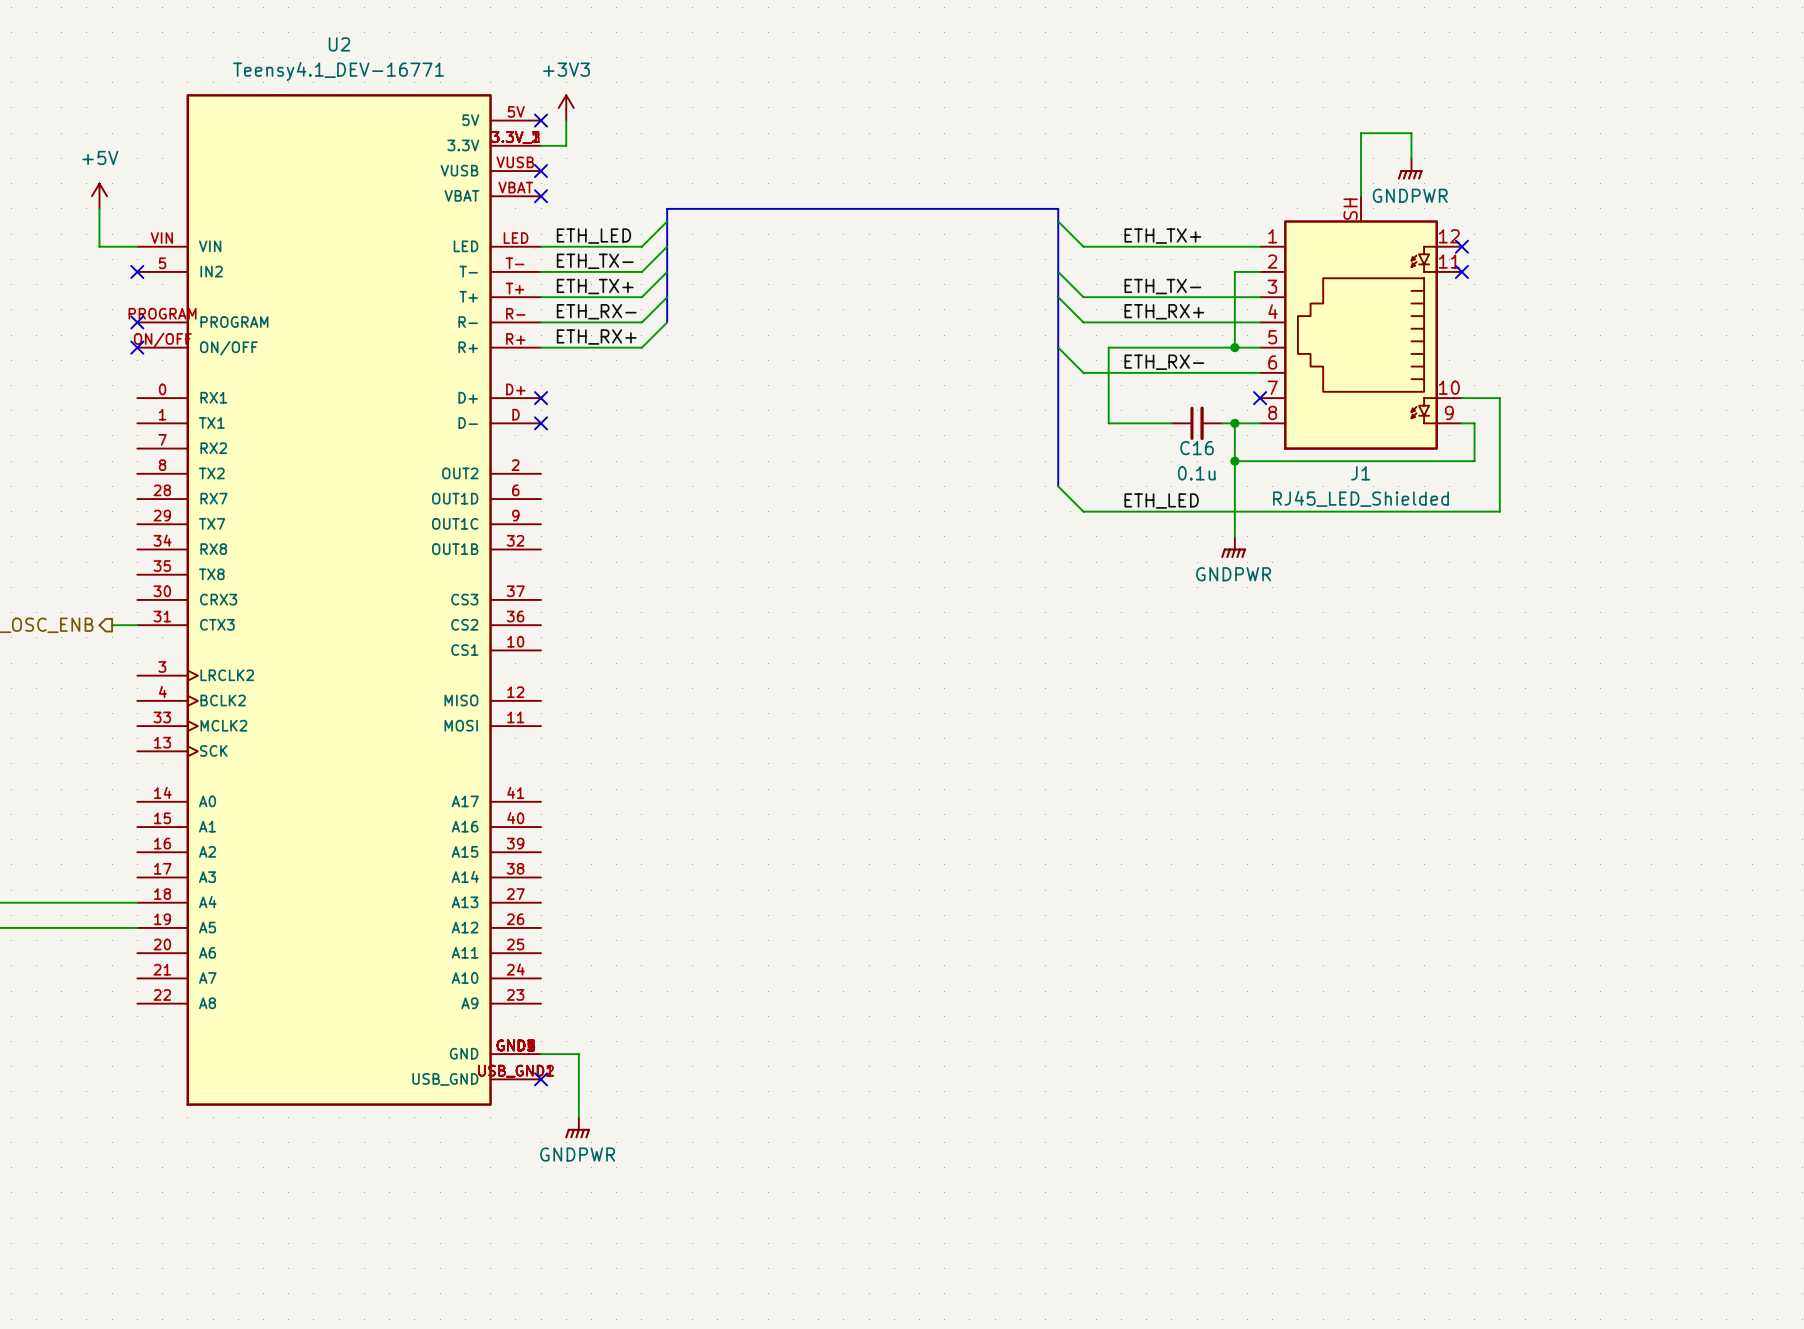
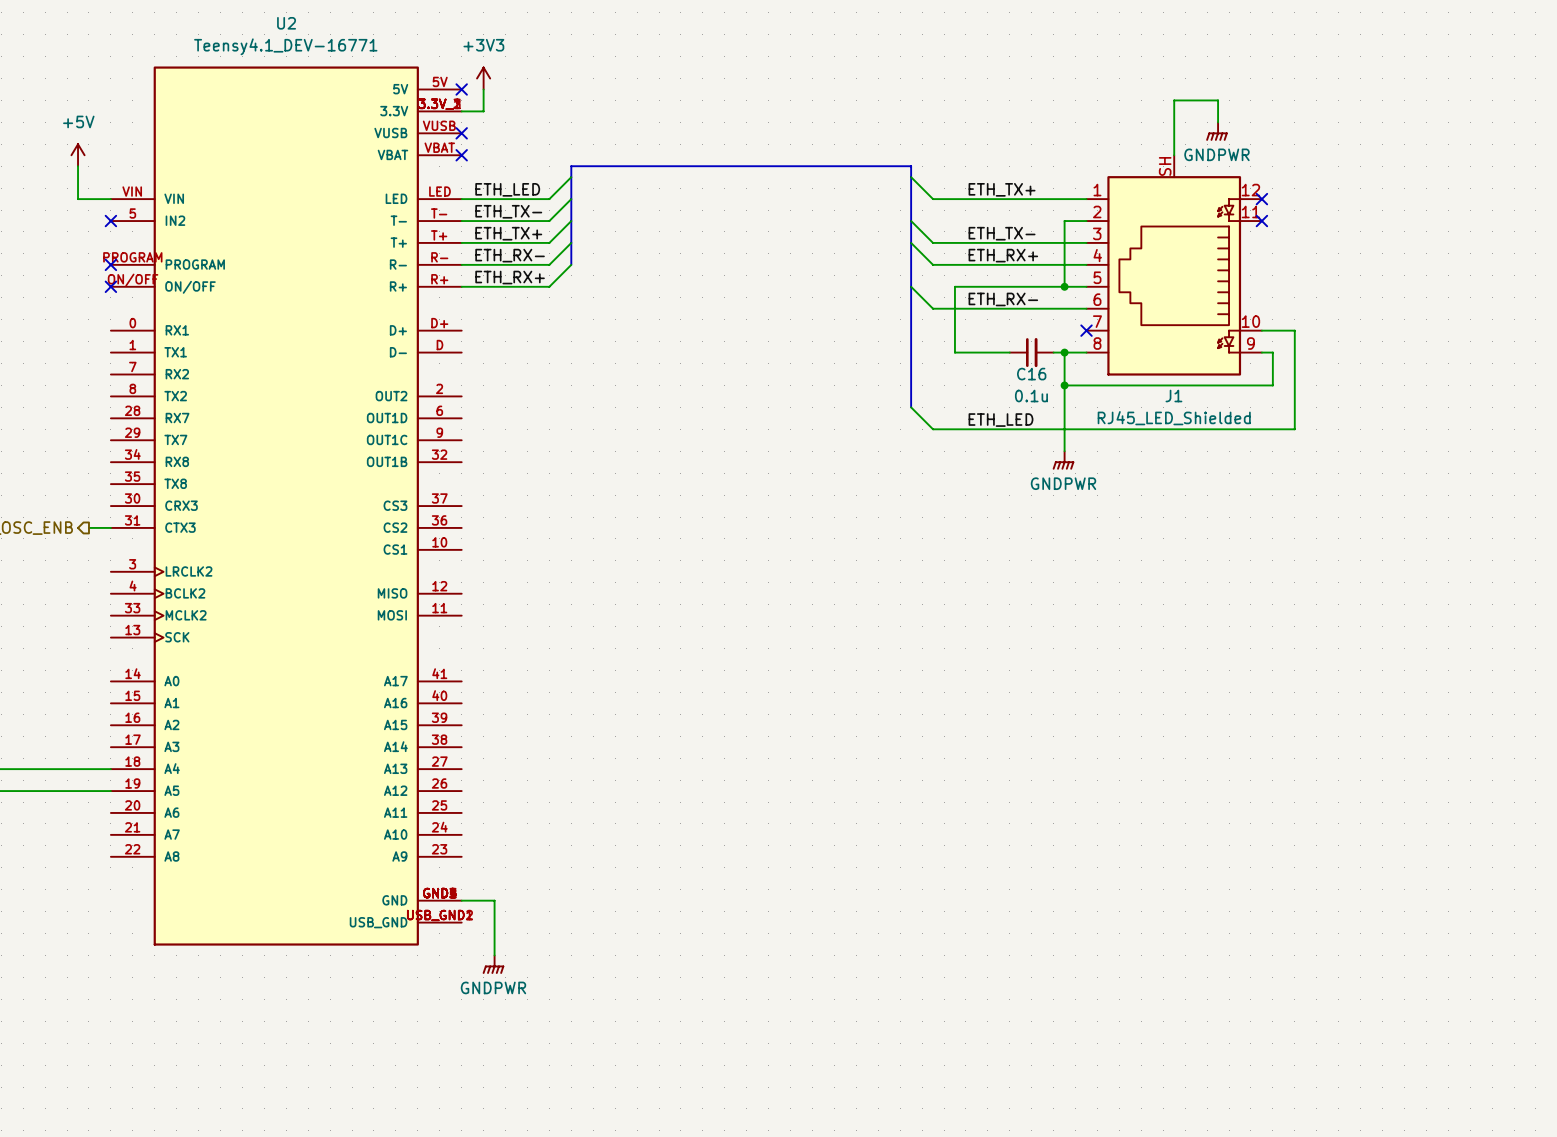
no-connect mark: (541, 398) -> none
no-connect mark: (541, 423) -> none
no-connect mark: (541, 1079) -> none

